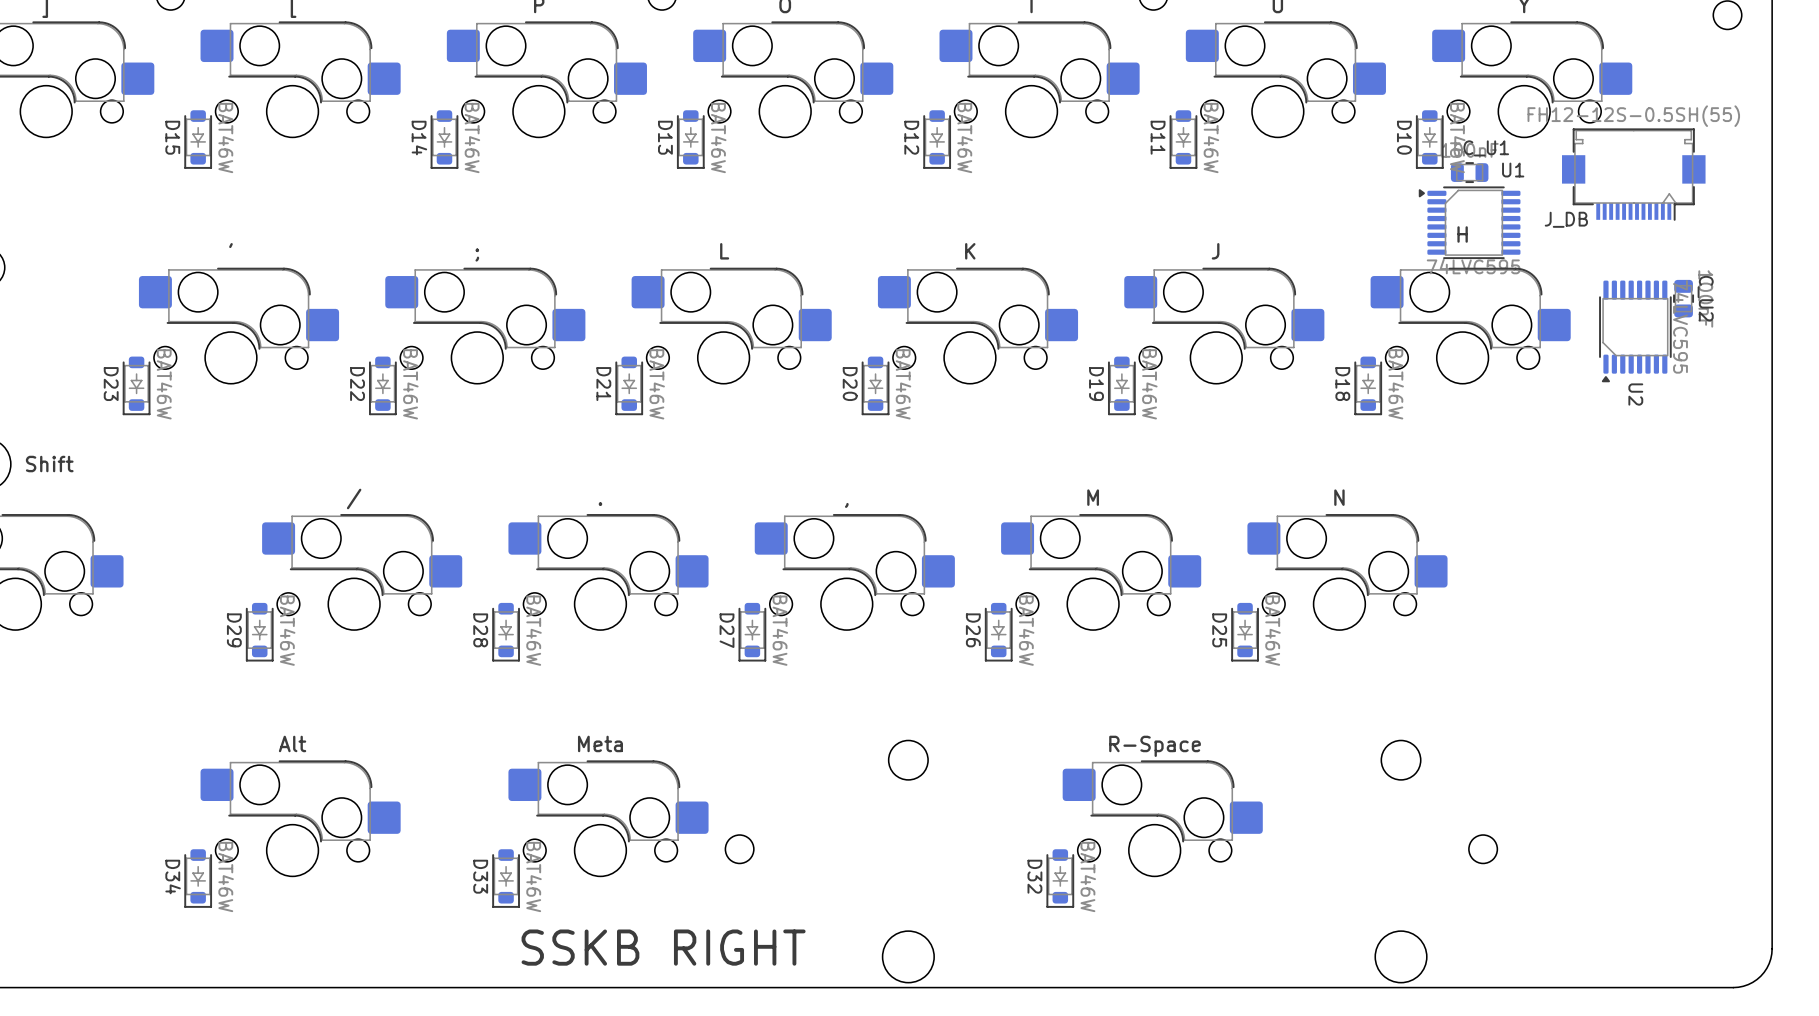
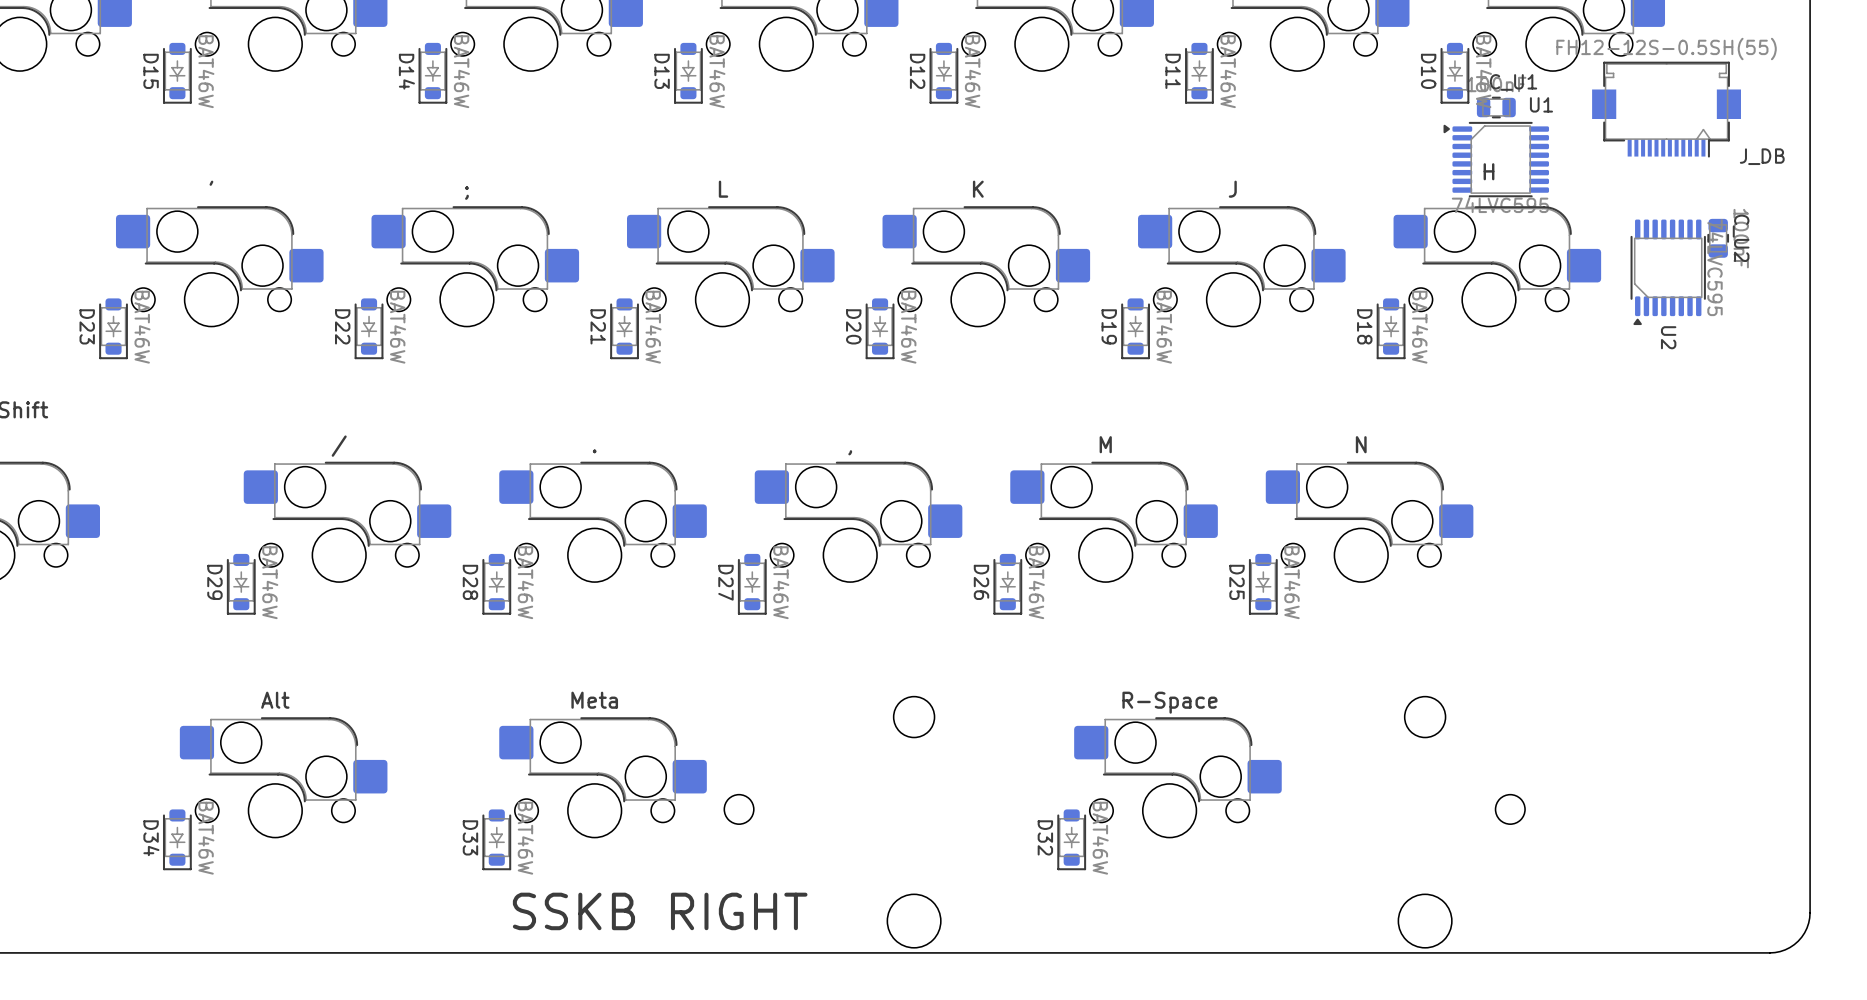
J_DB name position: J_DB (1566, 219) -> J_DB (1762, 156)

